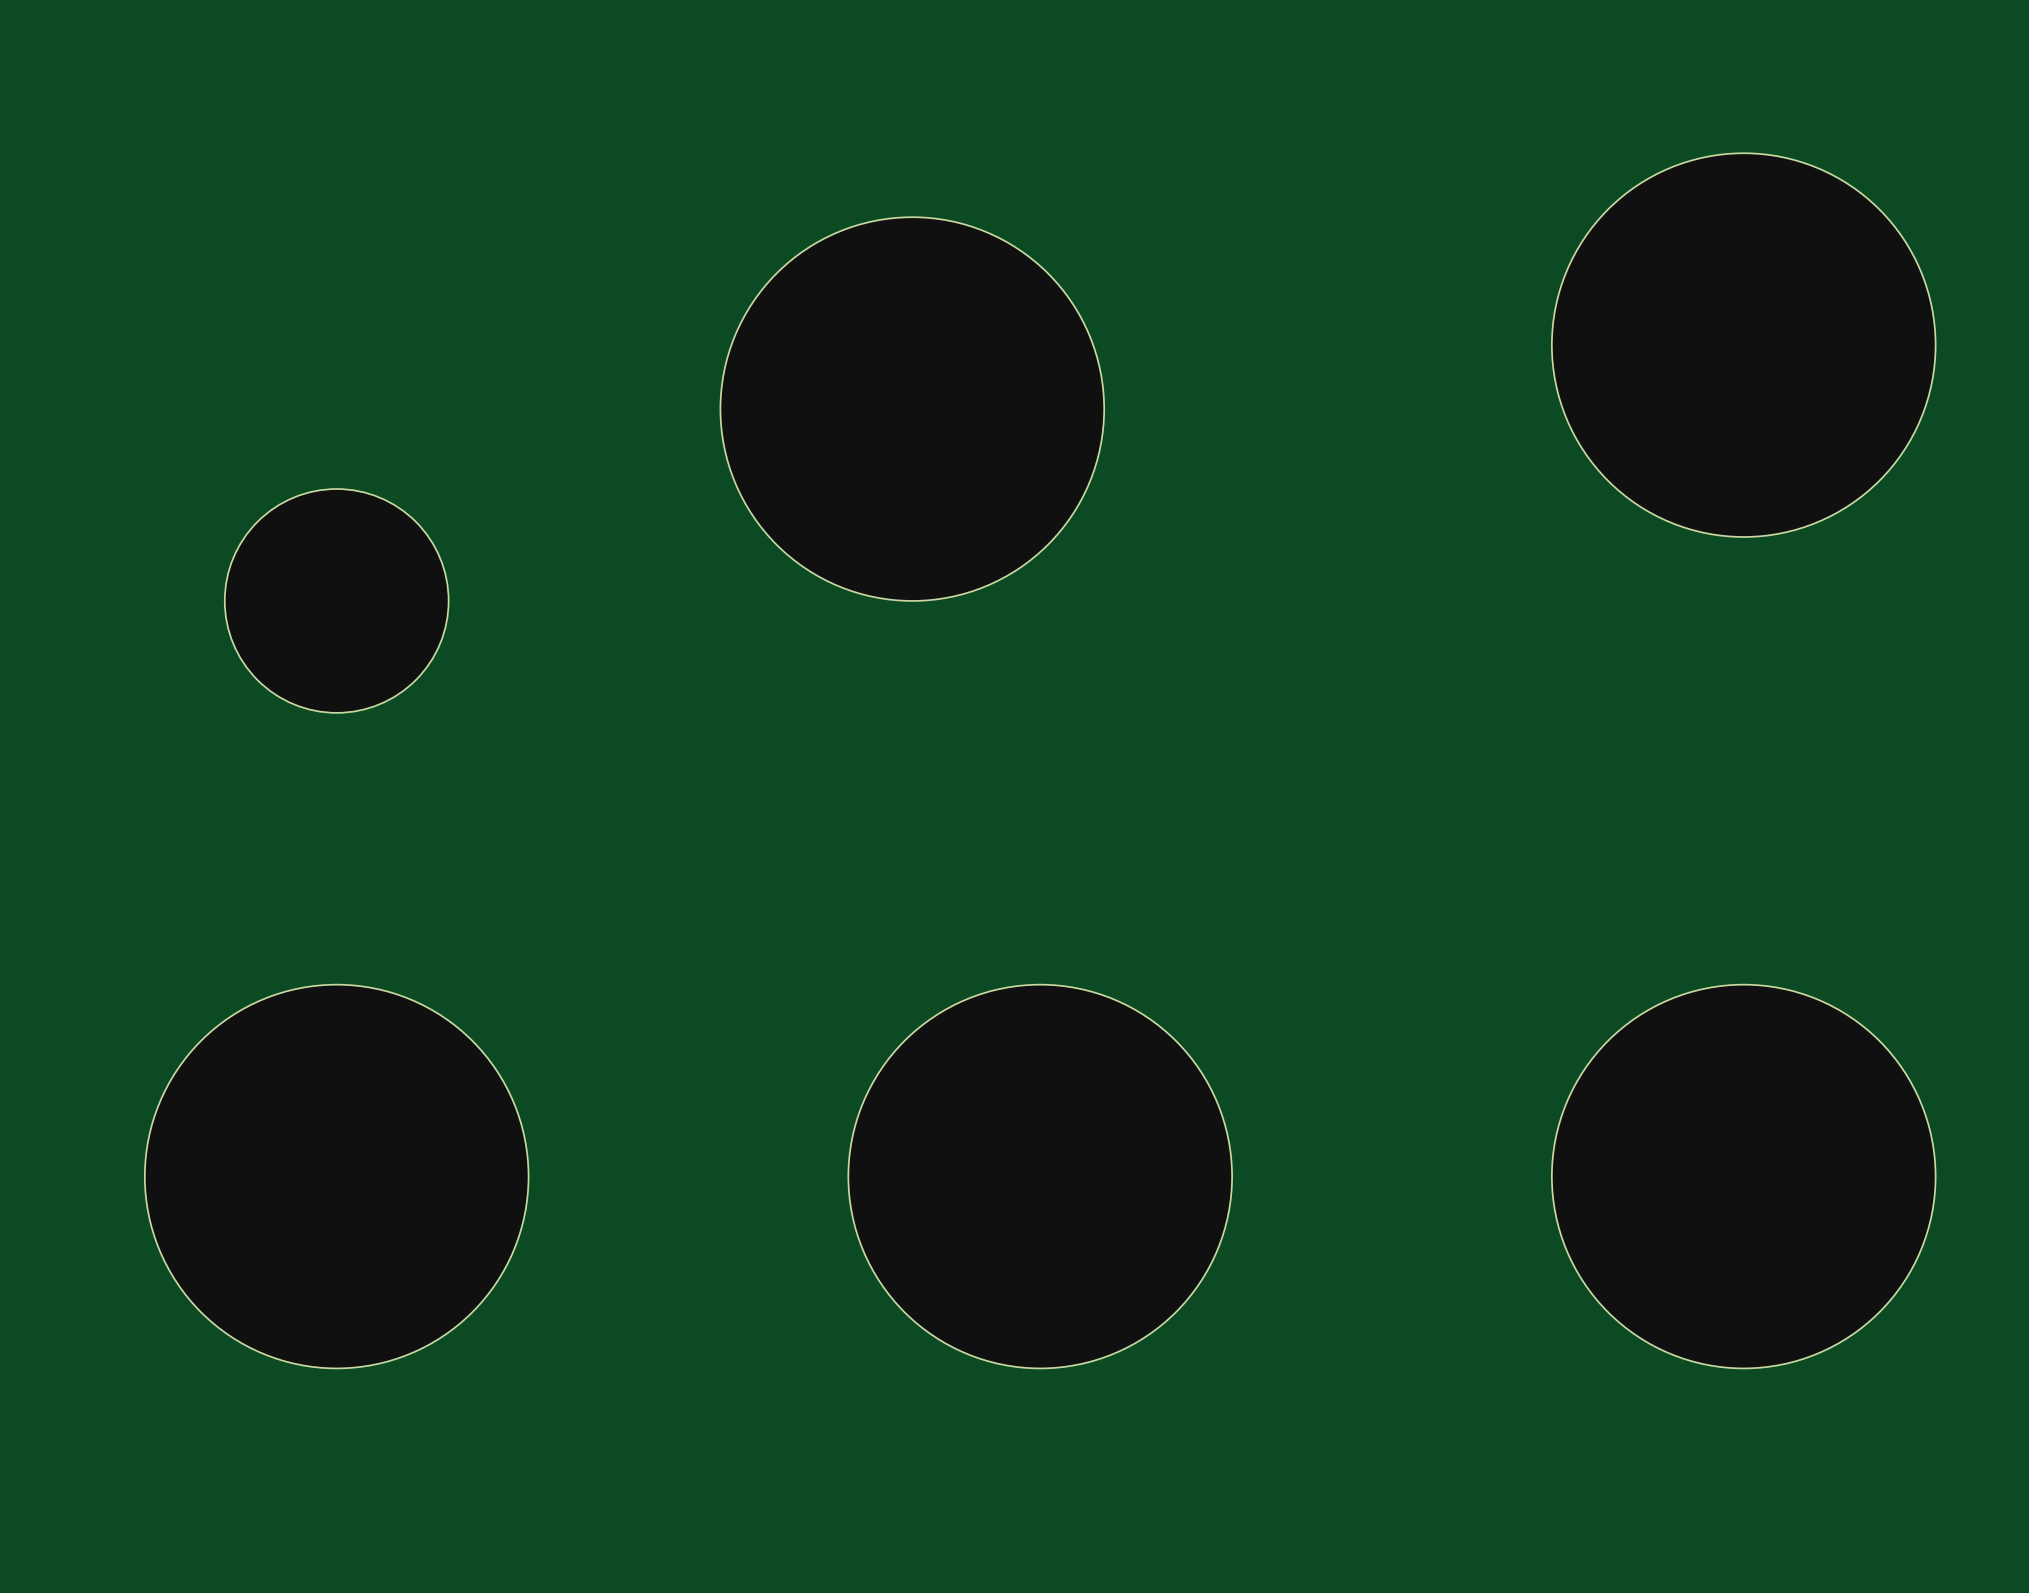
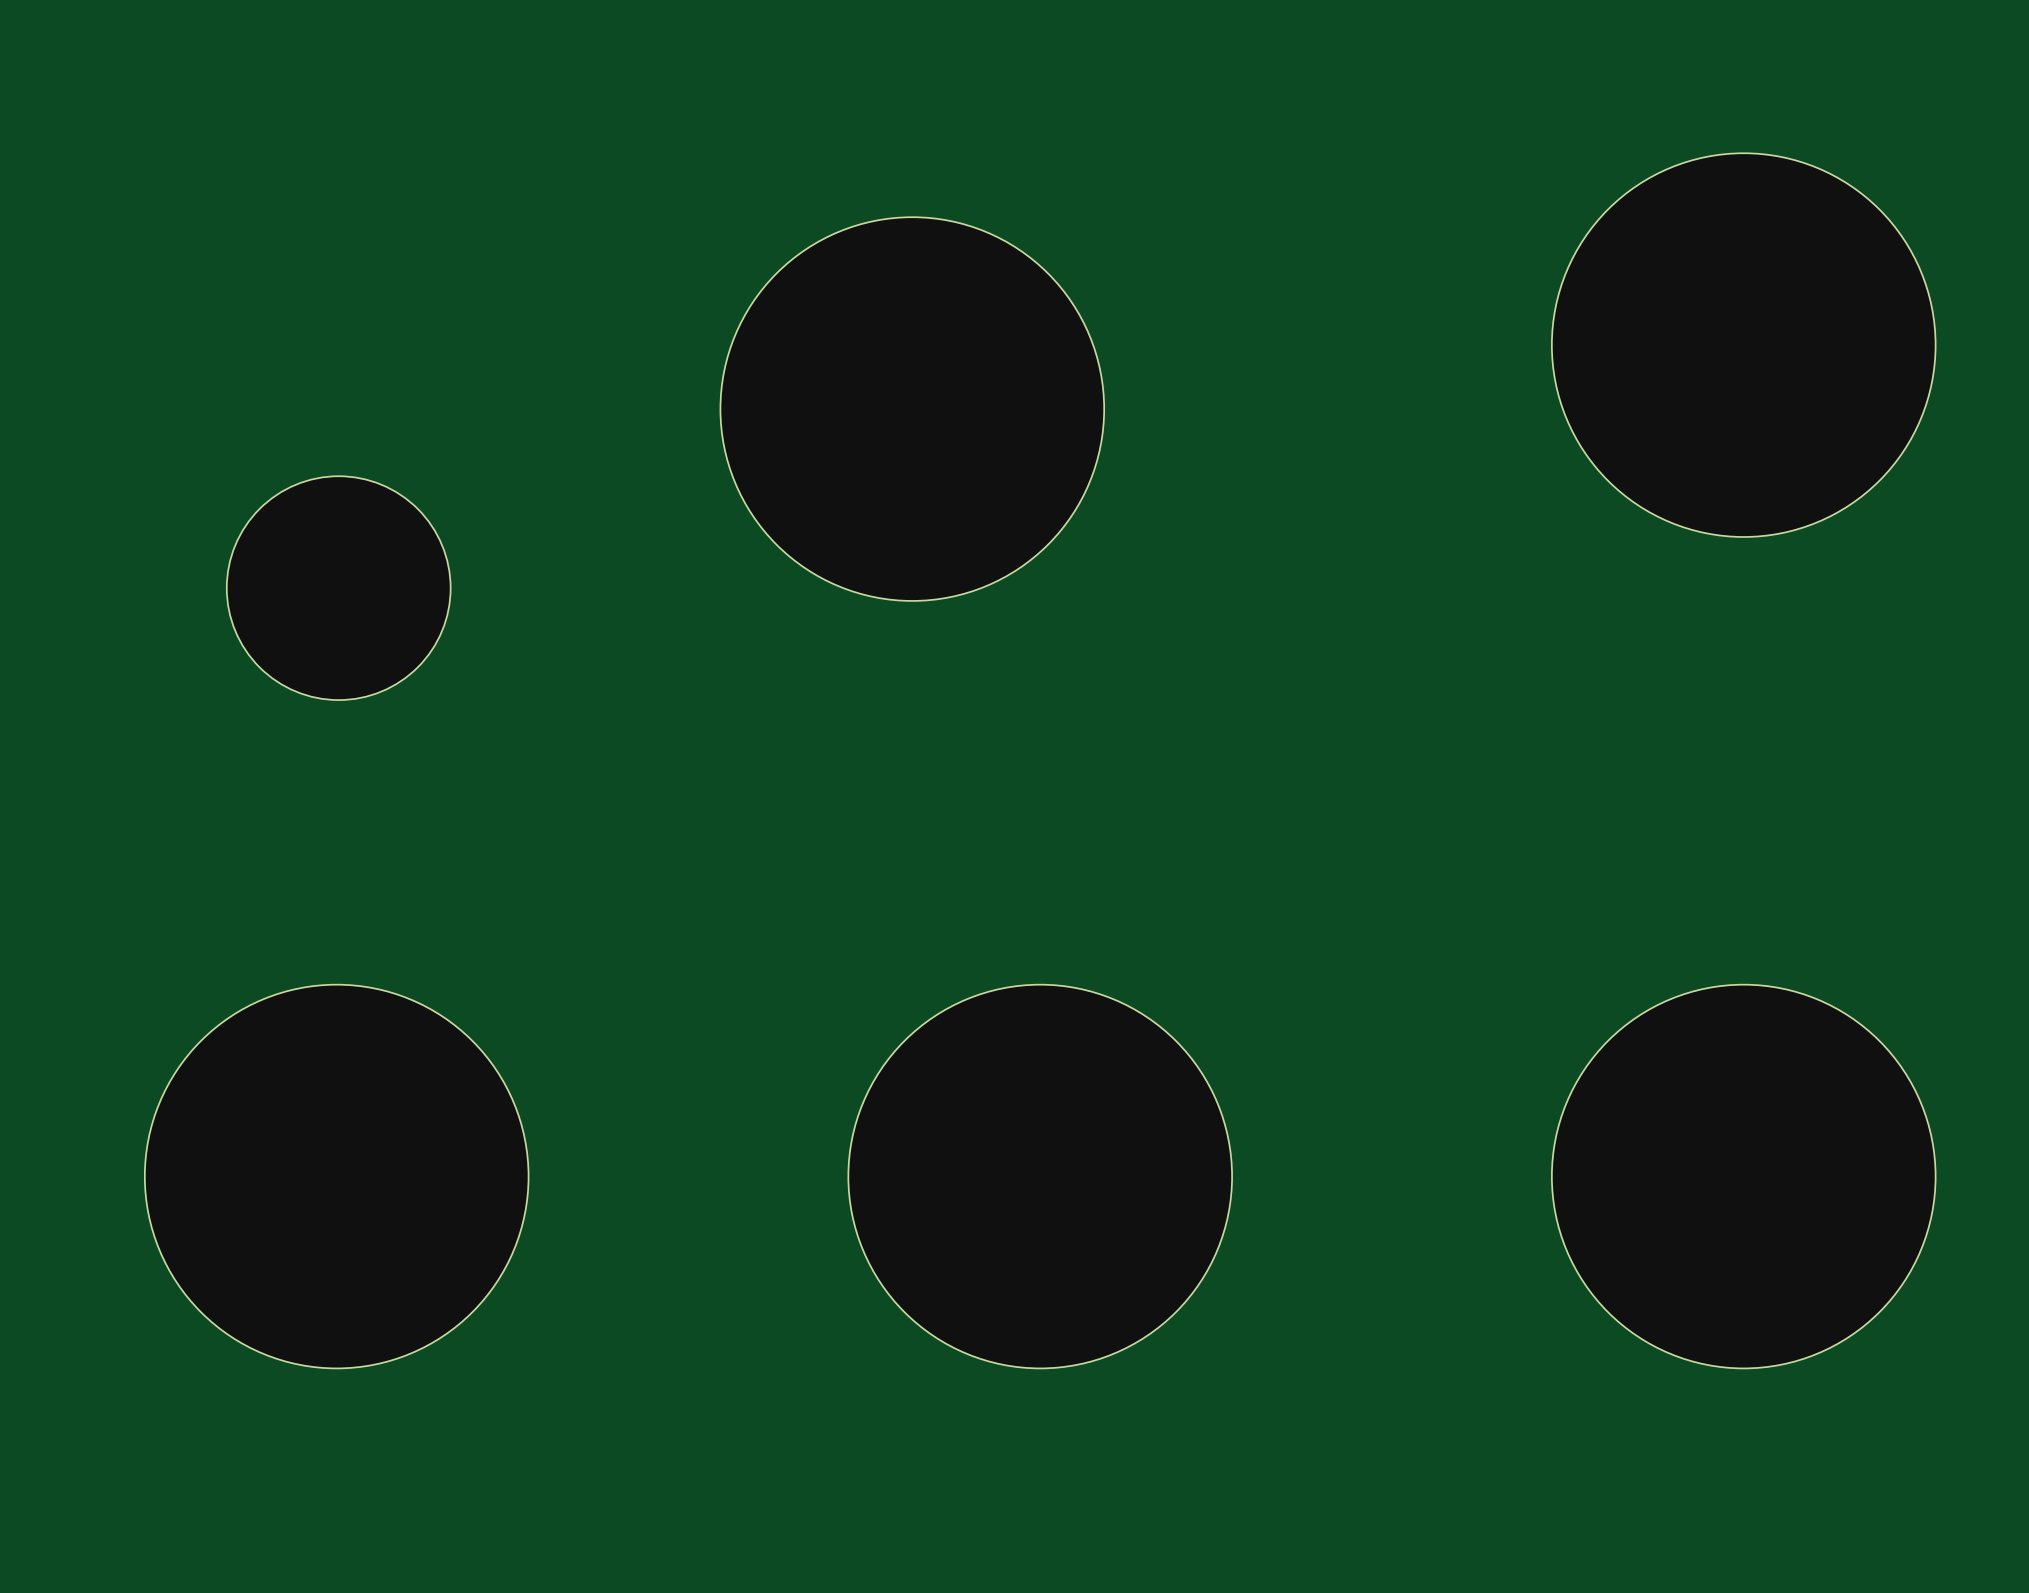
part position: (336, 600) -> (338, 588)

